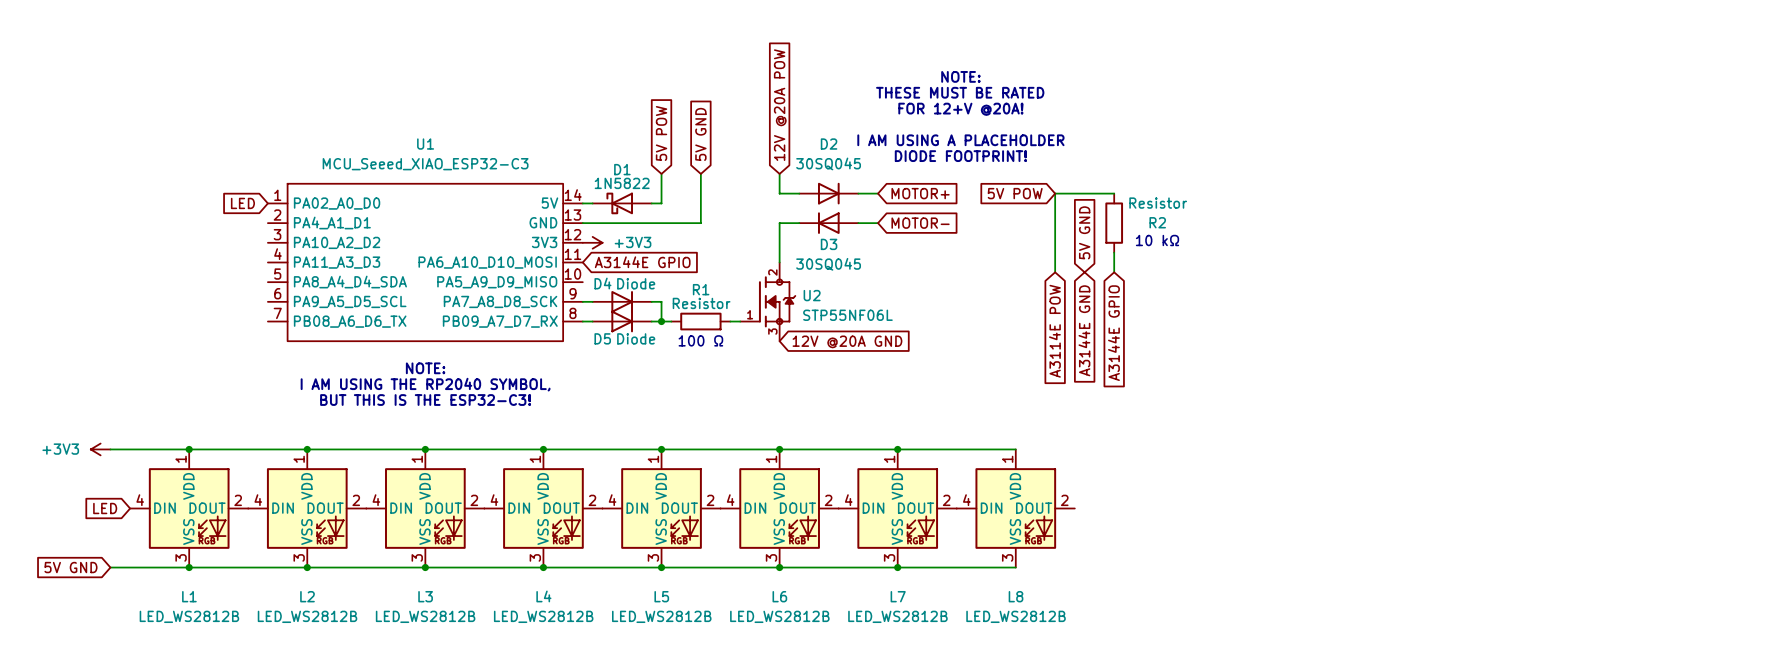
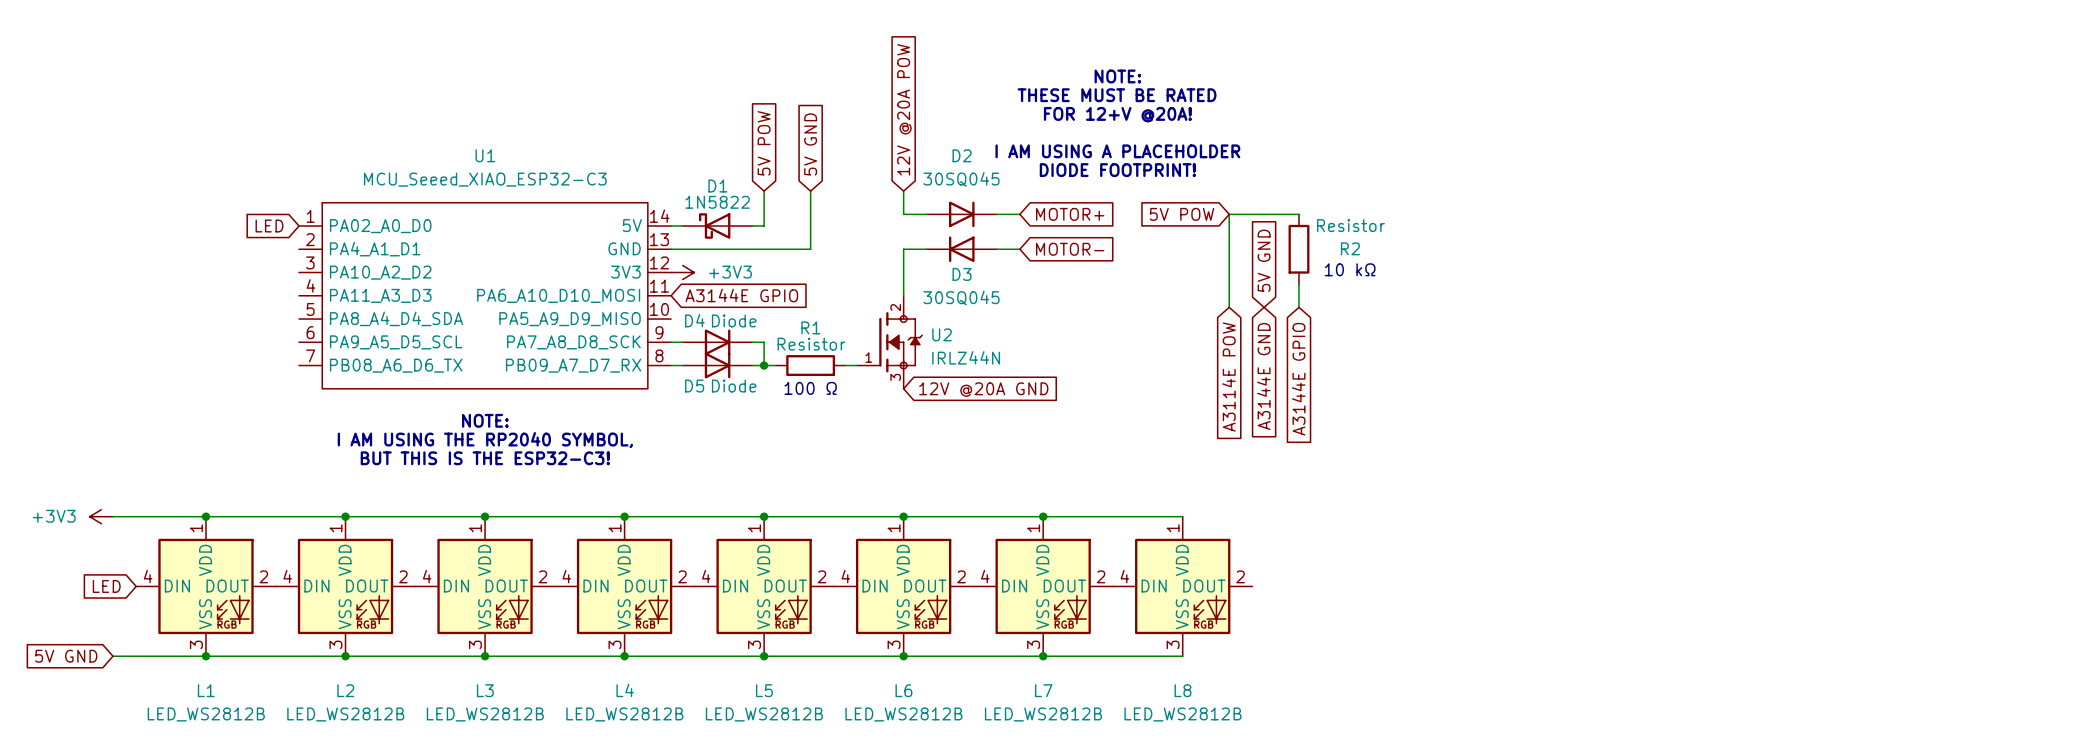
U2 value: STP55NF06L (847, 315) -> IRLZ44N (966, 357)

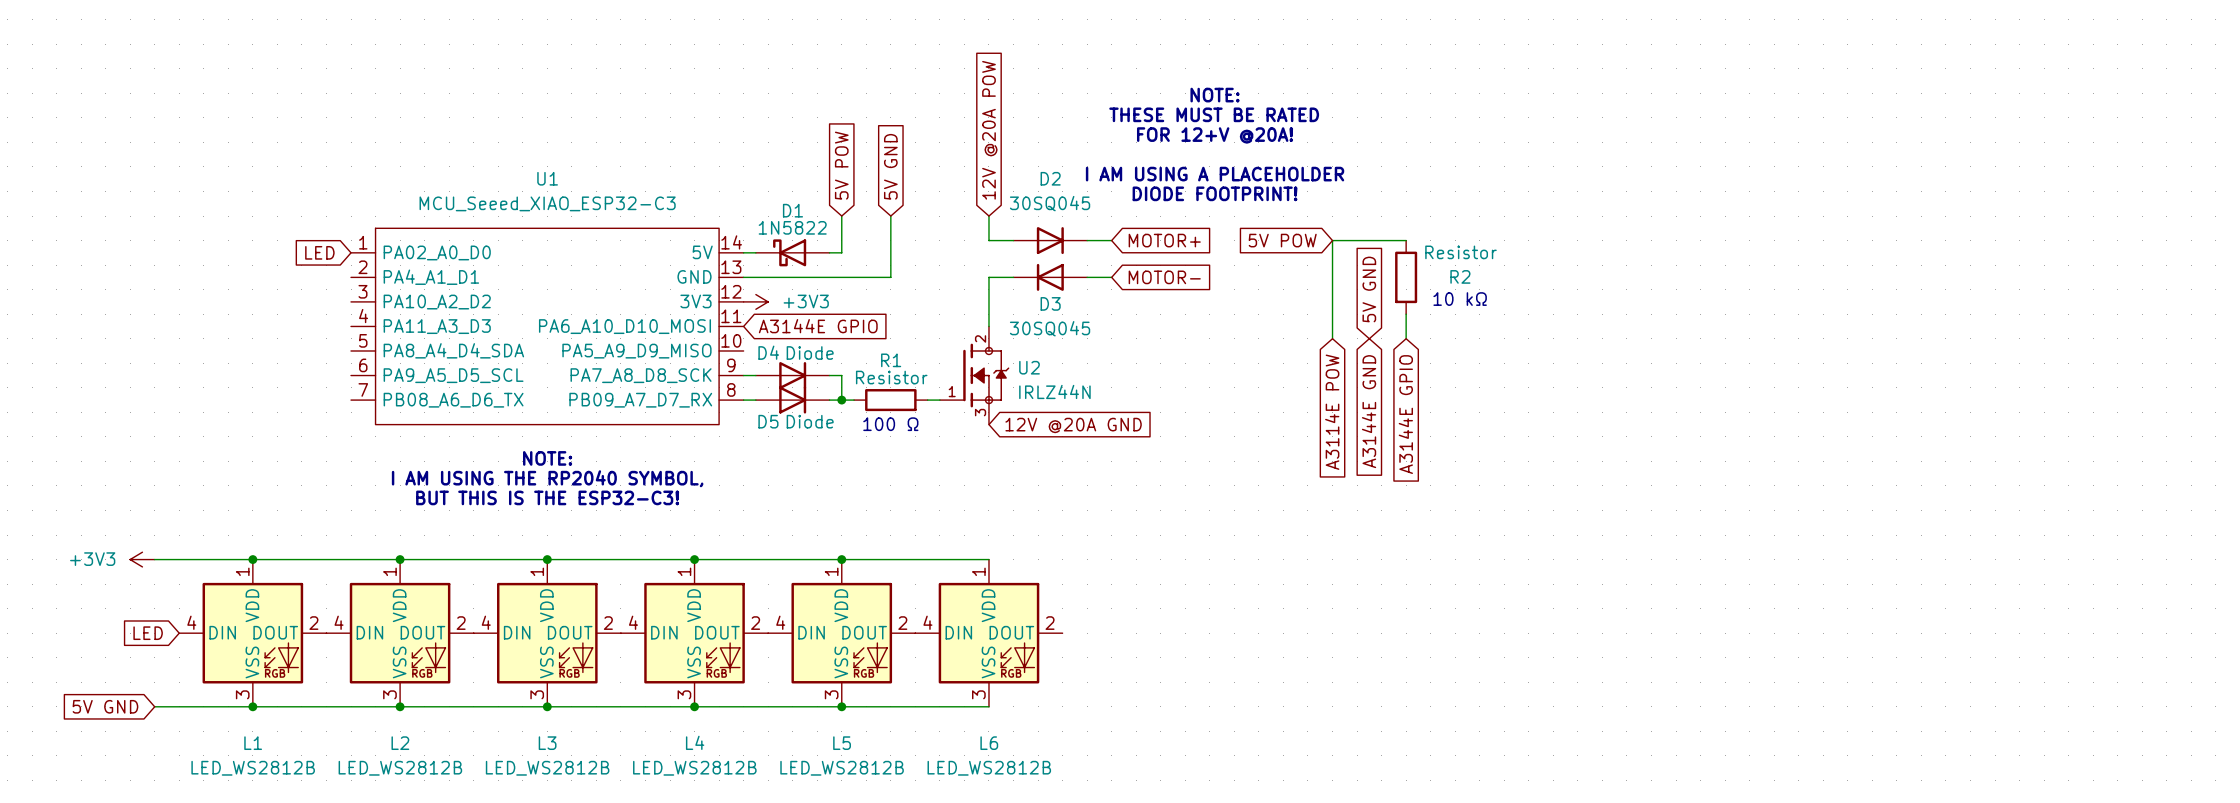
wire: (903, 516) (1182, 516) -> none
junction: (903, 516) -> none
junction: (1043, 516) -> none
L7: LED_WS2812B (1043, 586) -> none
L8: LED_WS2812B (1182, 586) -> none
wire: (903, 656) (1182, 656) -> none
junction: (903, 656) -> none
junction: (1043, 656) -> none

